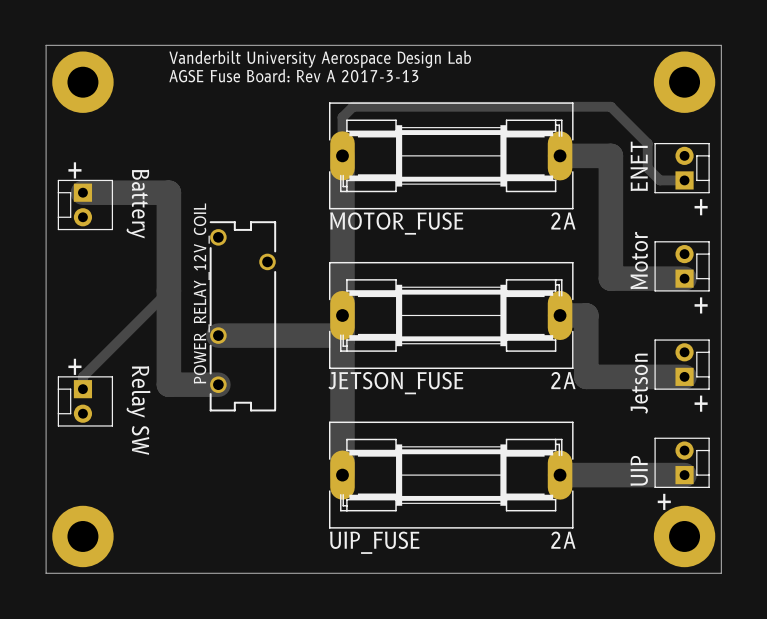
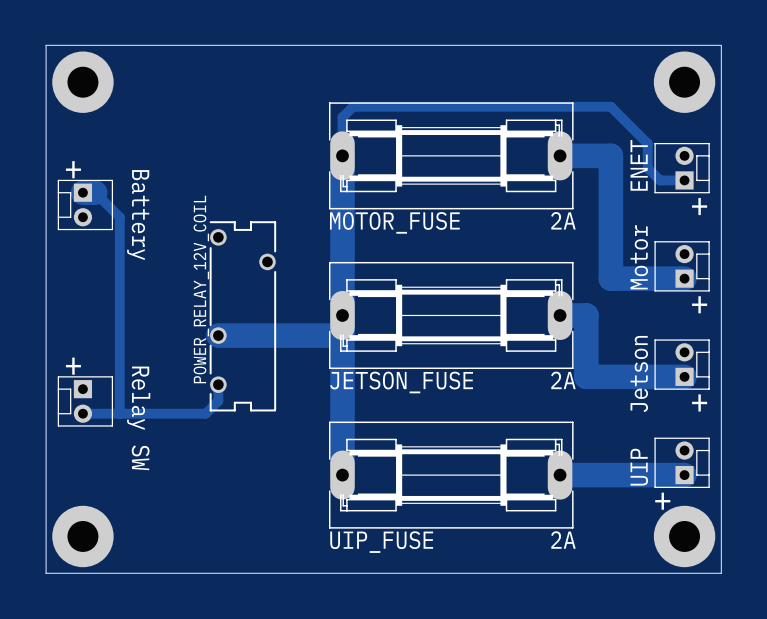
text: Vanderbilt University Aerospace Design Lab (320, 59) -> none
text: AGSE Fuse Board: Rev A 2017-3-13 (293, 75) -> none
track: (95, 192) (168, 192) (168, 384) (218, 384) -> (95, 192) (119, 217) (119, 413)
track: (168, 290) (82, 376) (82, 389) -> none
track: none -> (218, 384) (218, 401) (205, 413) (82, 413)

